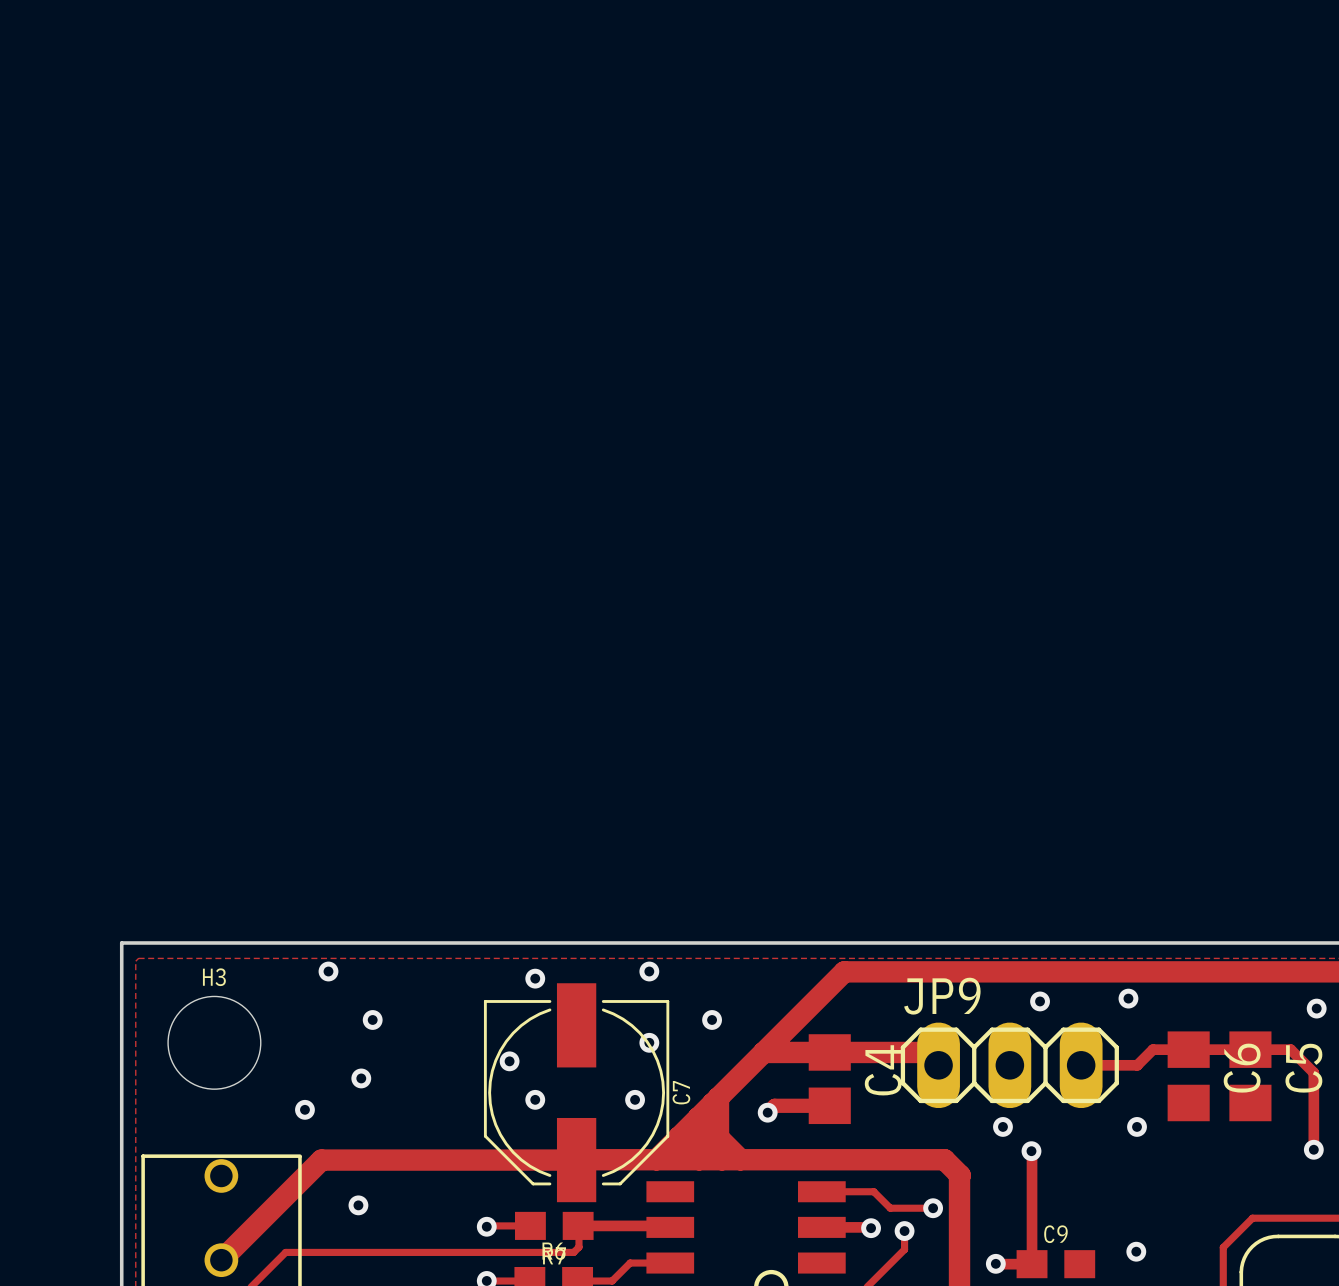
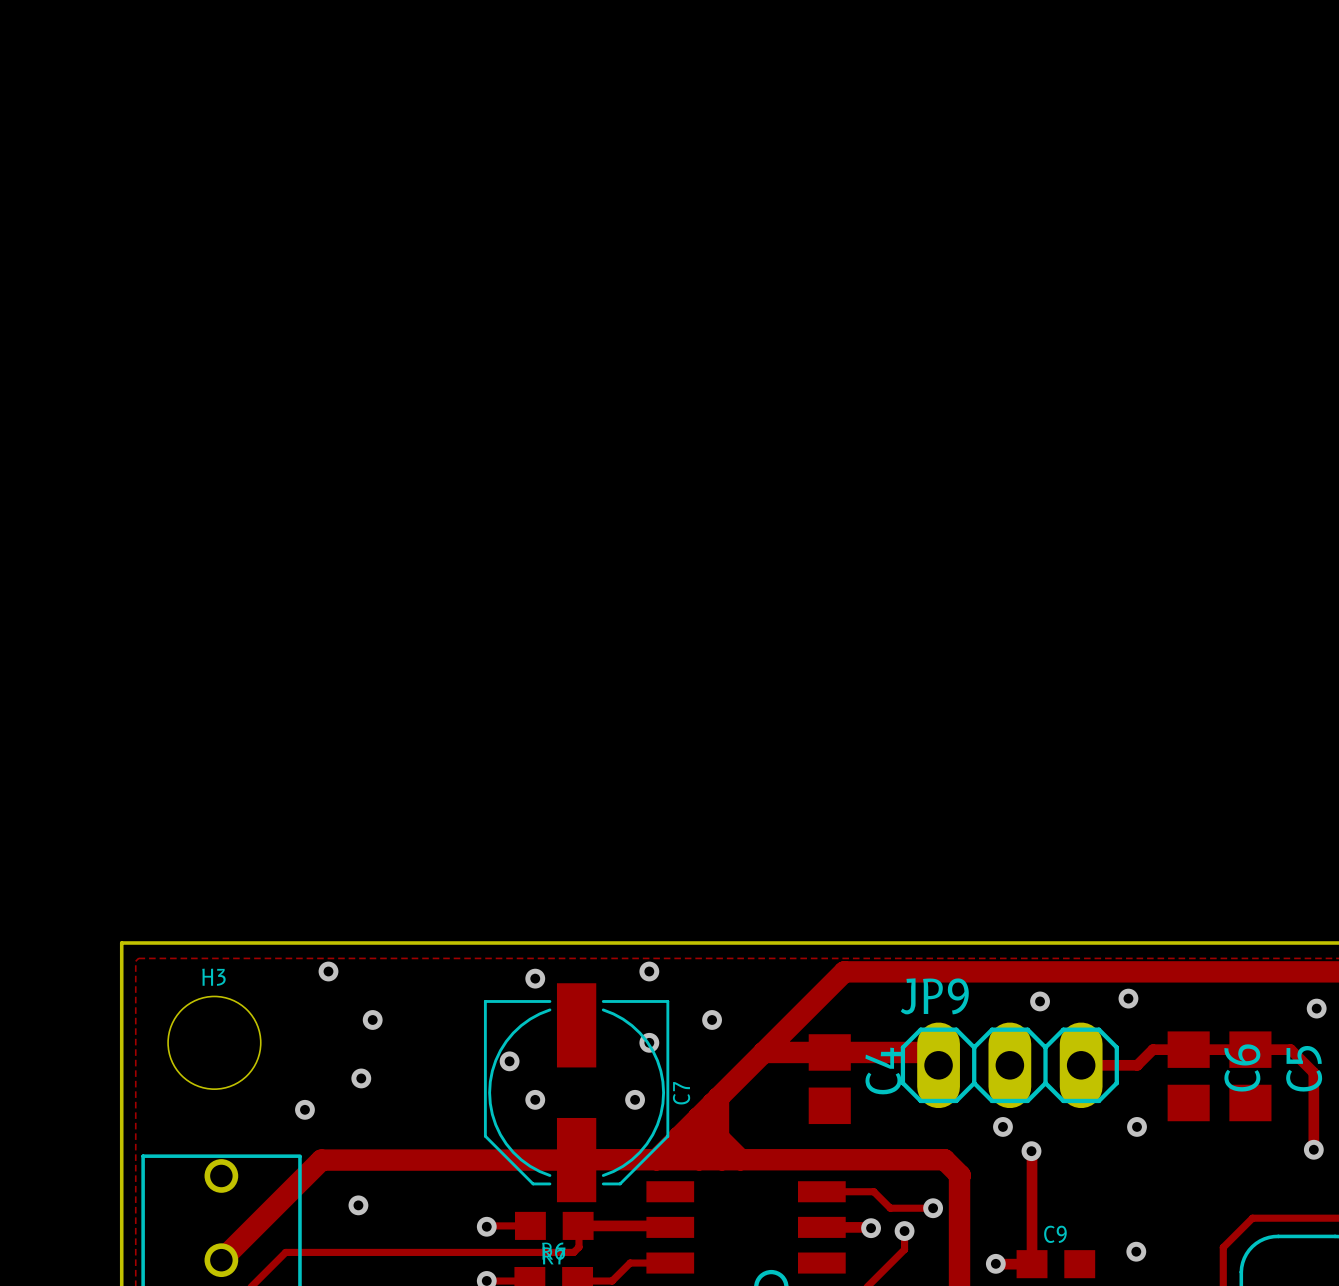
track: (829, 1105) (774, 1105) (767, 1112) -> none
via: (767, 1112) -> none

